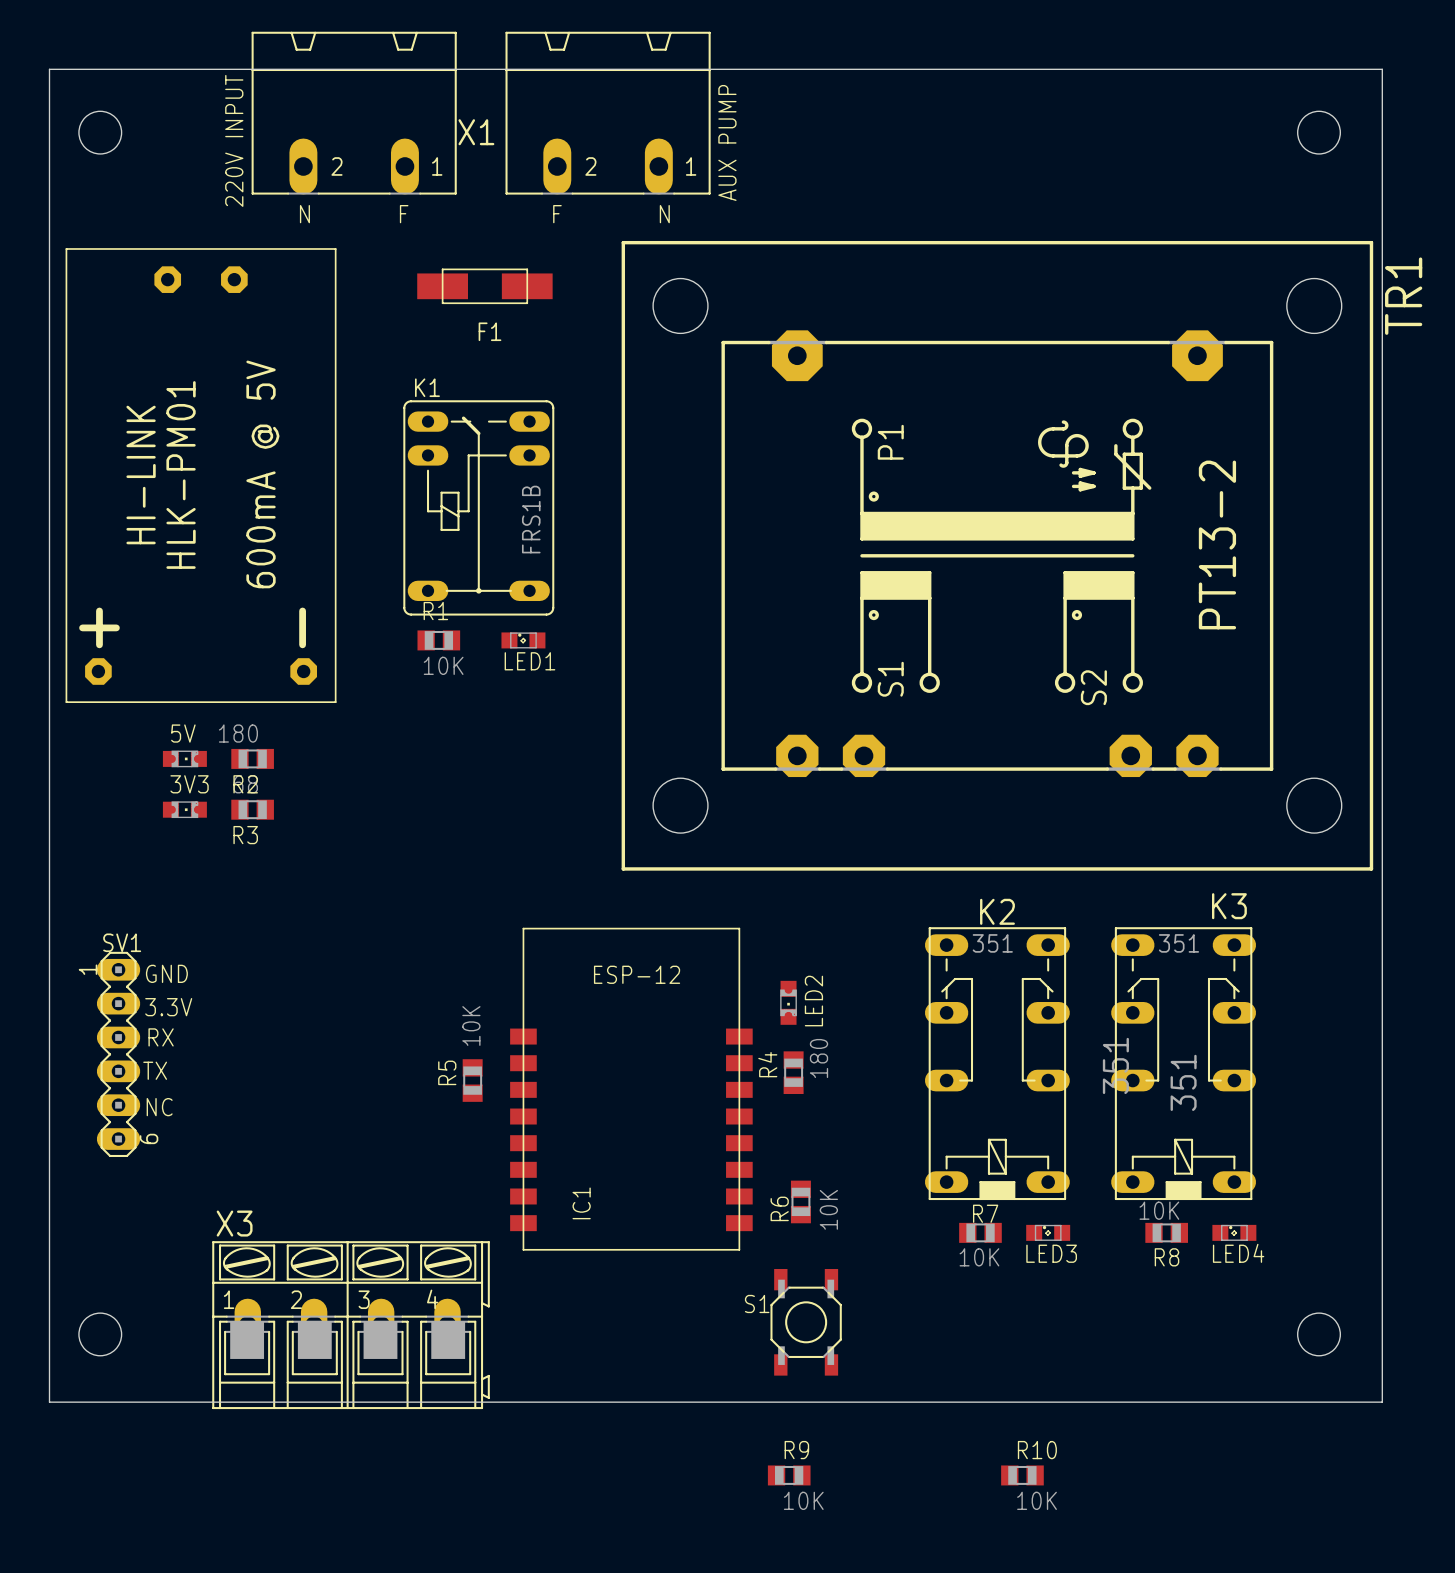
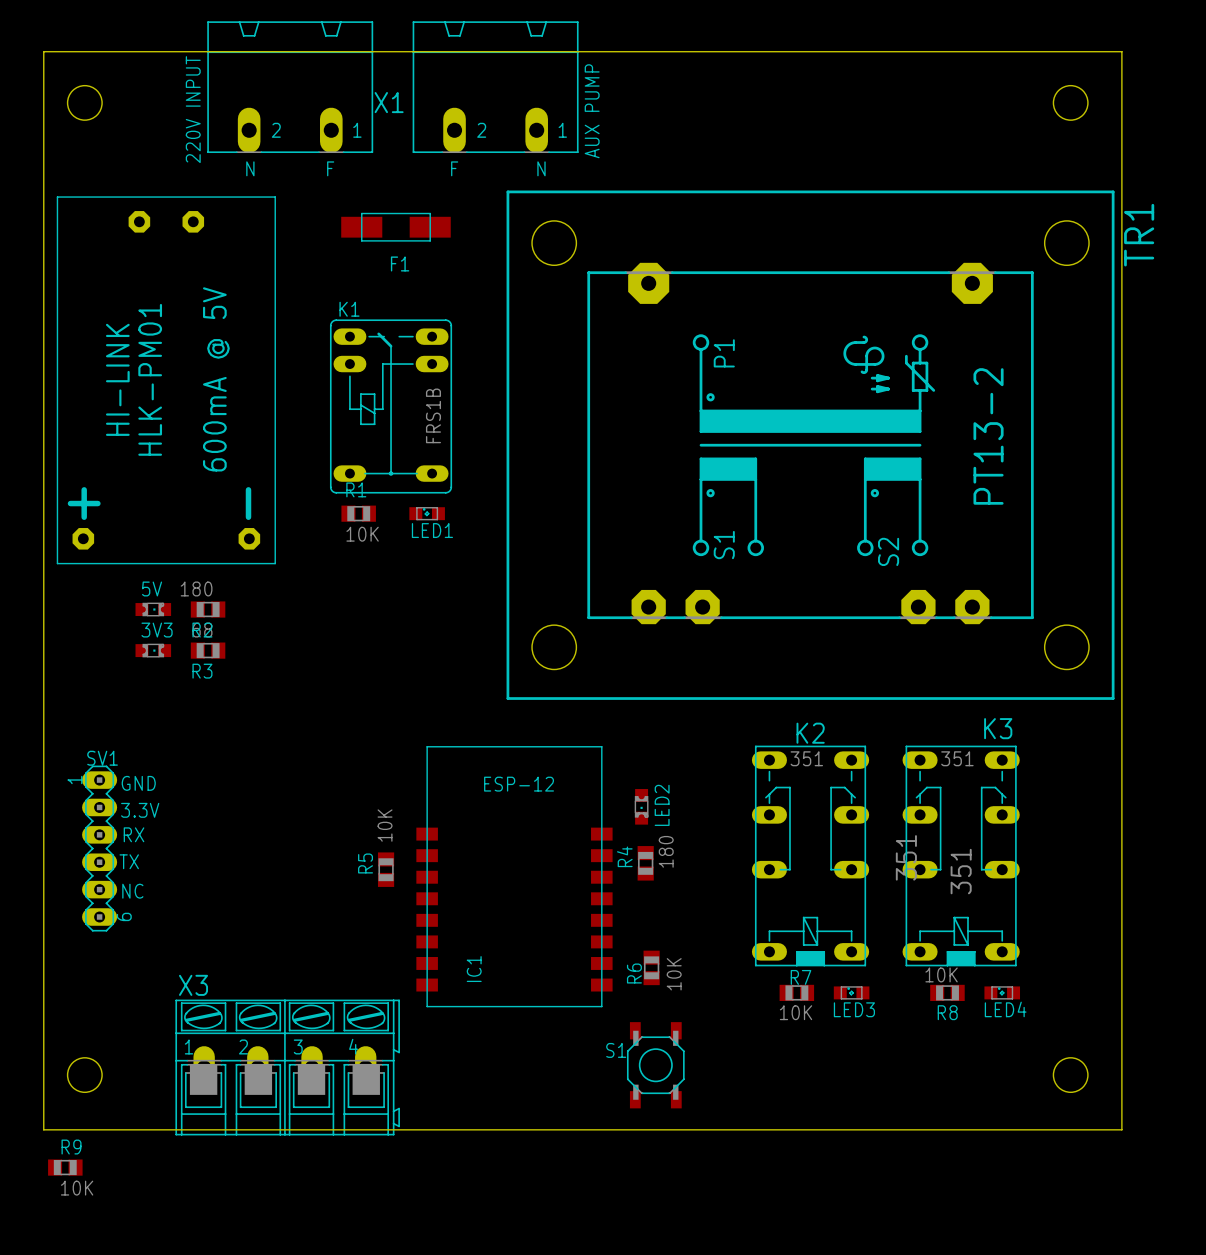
R9 position: (789, 1475) -> (65, 1167)
R10: 10K (1022, 1475) -> none

